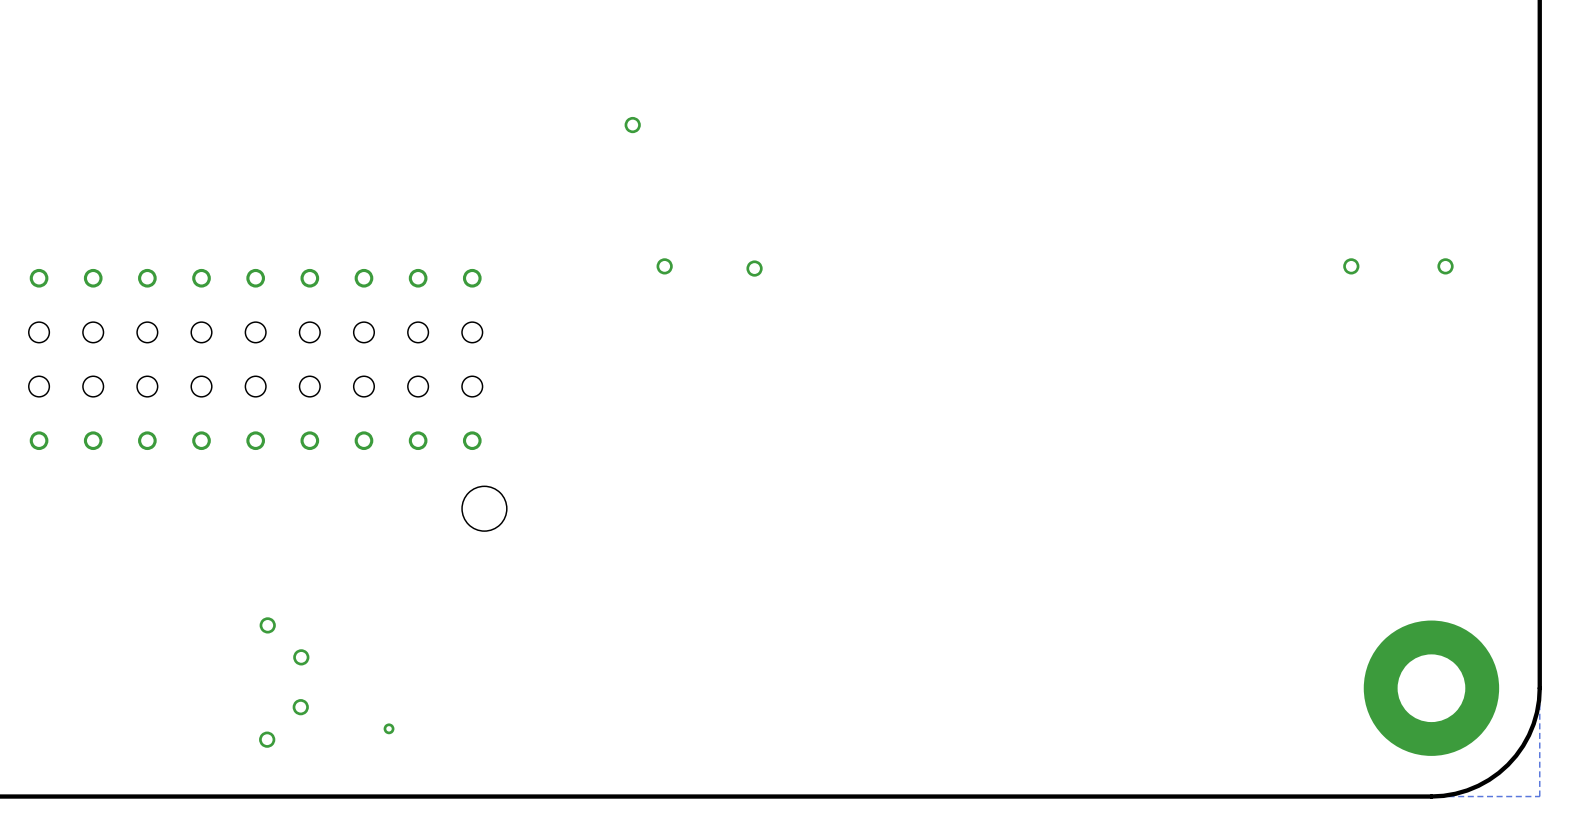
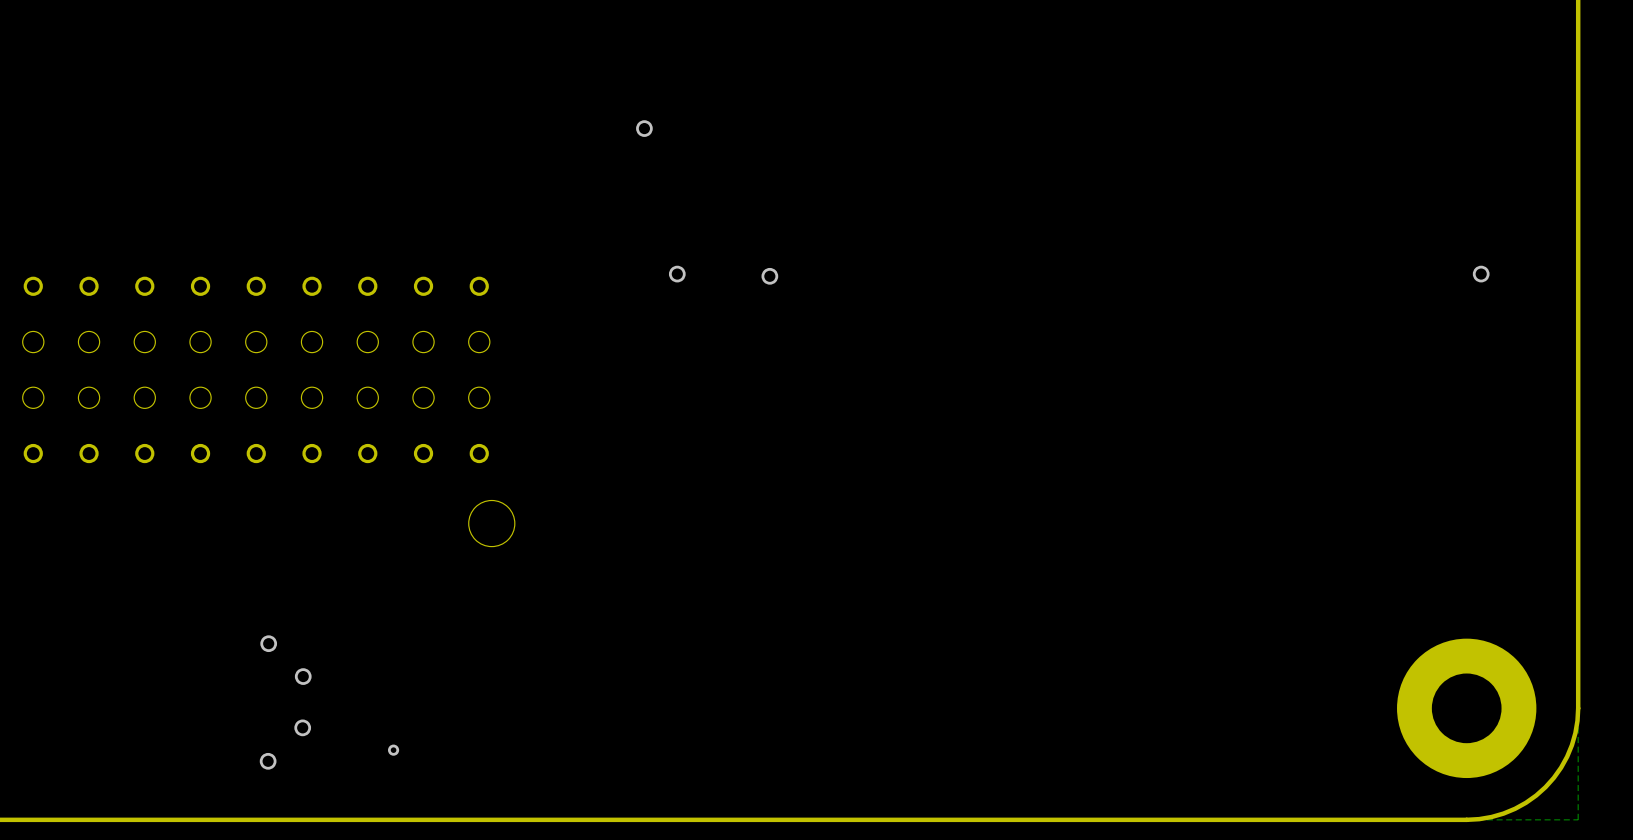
via: (1351, 266) -> none

